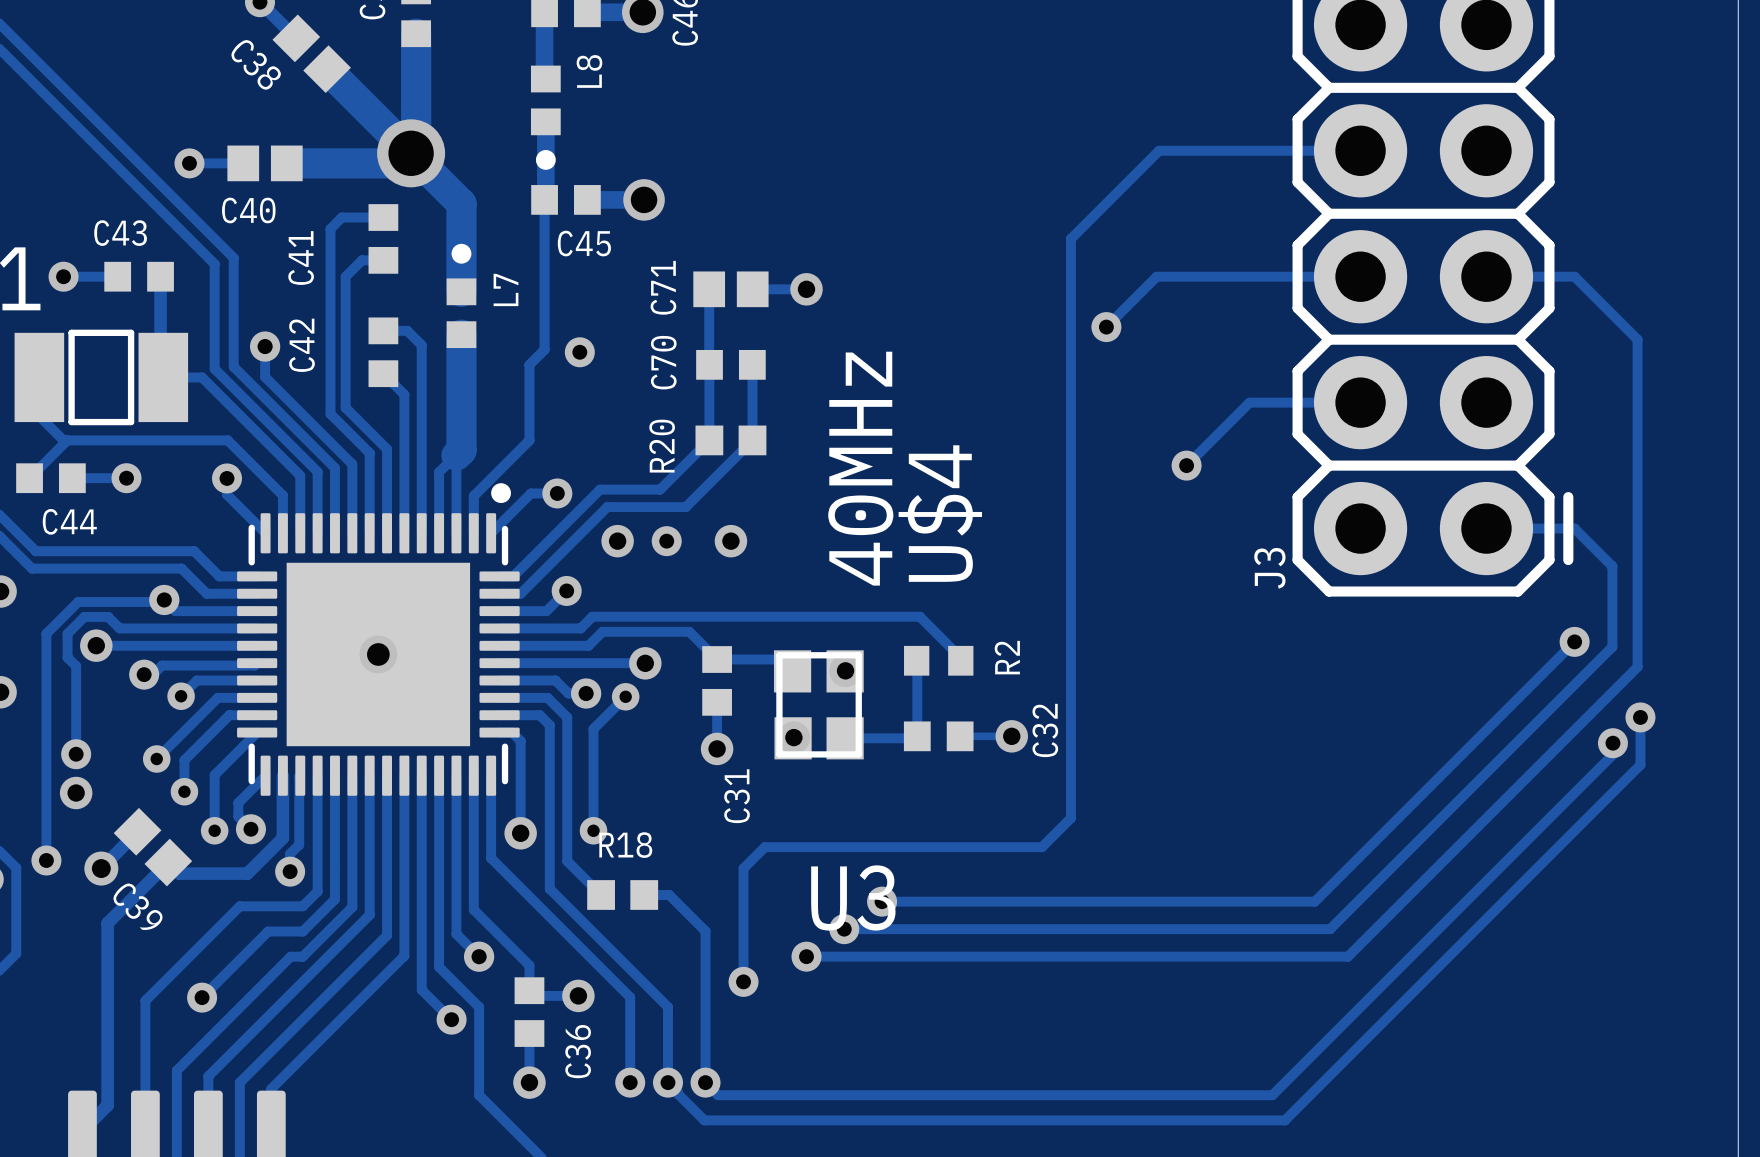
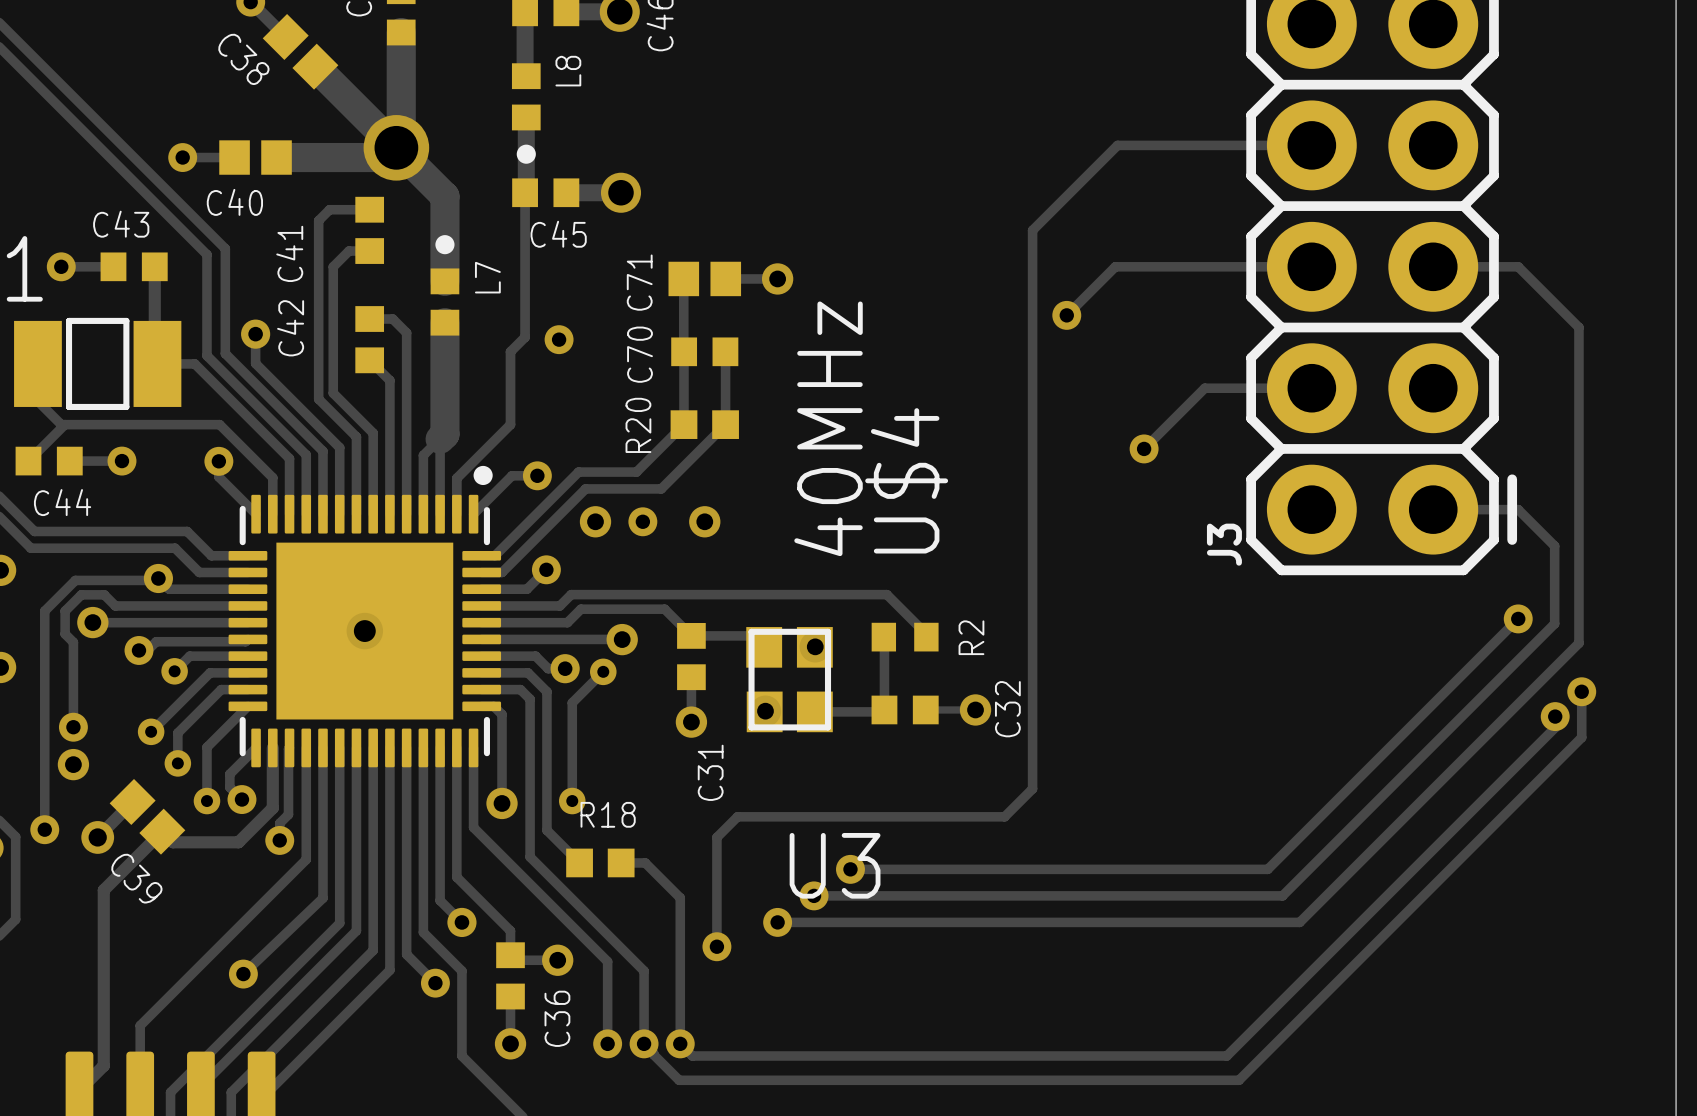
track: (334, 899) (302, 931) (268, 931) (202, 997) -> (322, 867) (322, 898) (243, 974)
track: (302, 906) (239, 906) (145, 1000) (145, 1063) -> (291, 873) (140, 1025)
track: (352, 907) (302, 956) (290, 956) (176, 1070) (176, 1132) -> (339, 874) (339, 923) (170, 1092)
track: (369, 915) (208, 1076) (208, 1126) -> (356, 882) (356, 930) (200, 1086)
track: (387, 935) (239, 1082) (239, 1132) -> (373, 901) (373, 950) (231, 1092)
track: (404, 955) (271, 1088) (271, 1130) -> (389, 921) (389, 970) (270, 1090) (261, 1090)
via position: (202, 997) -> (243, 974)

